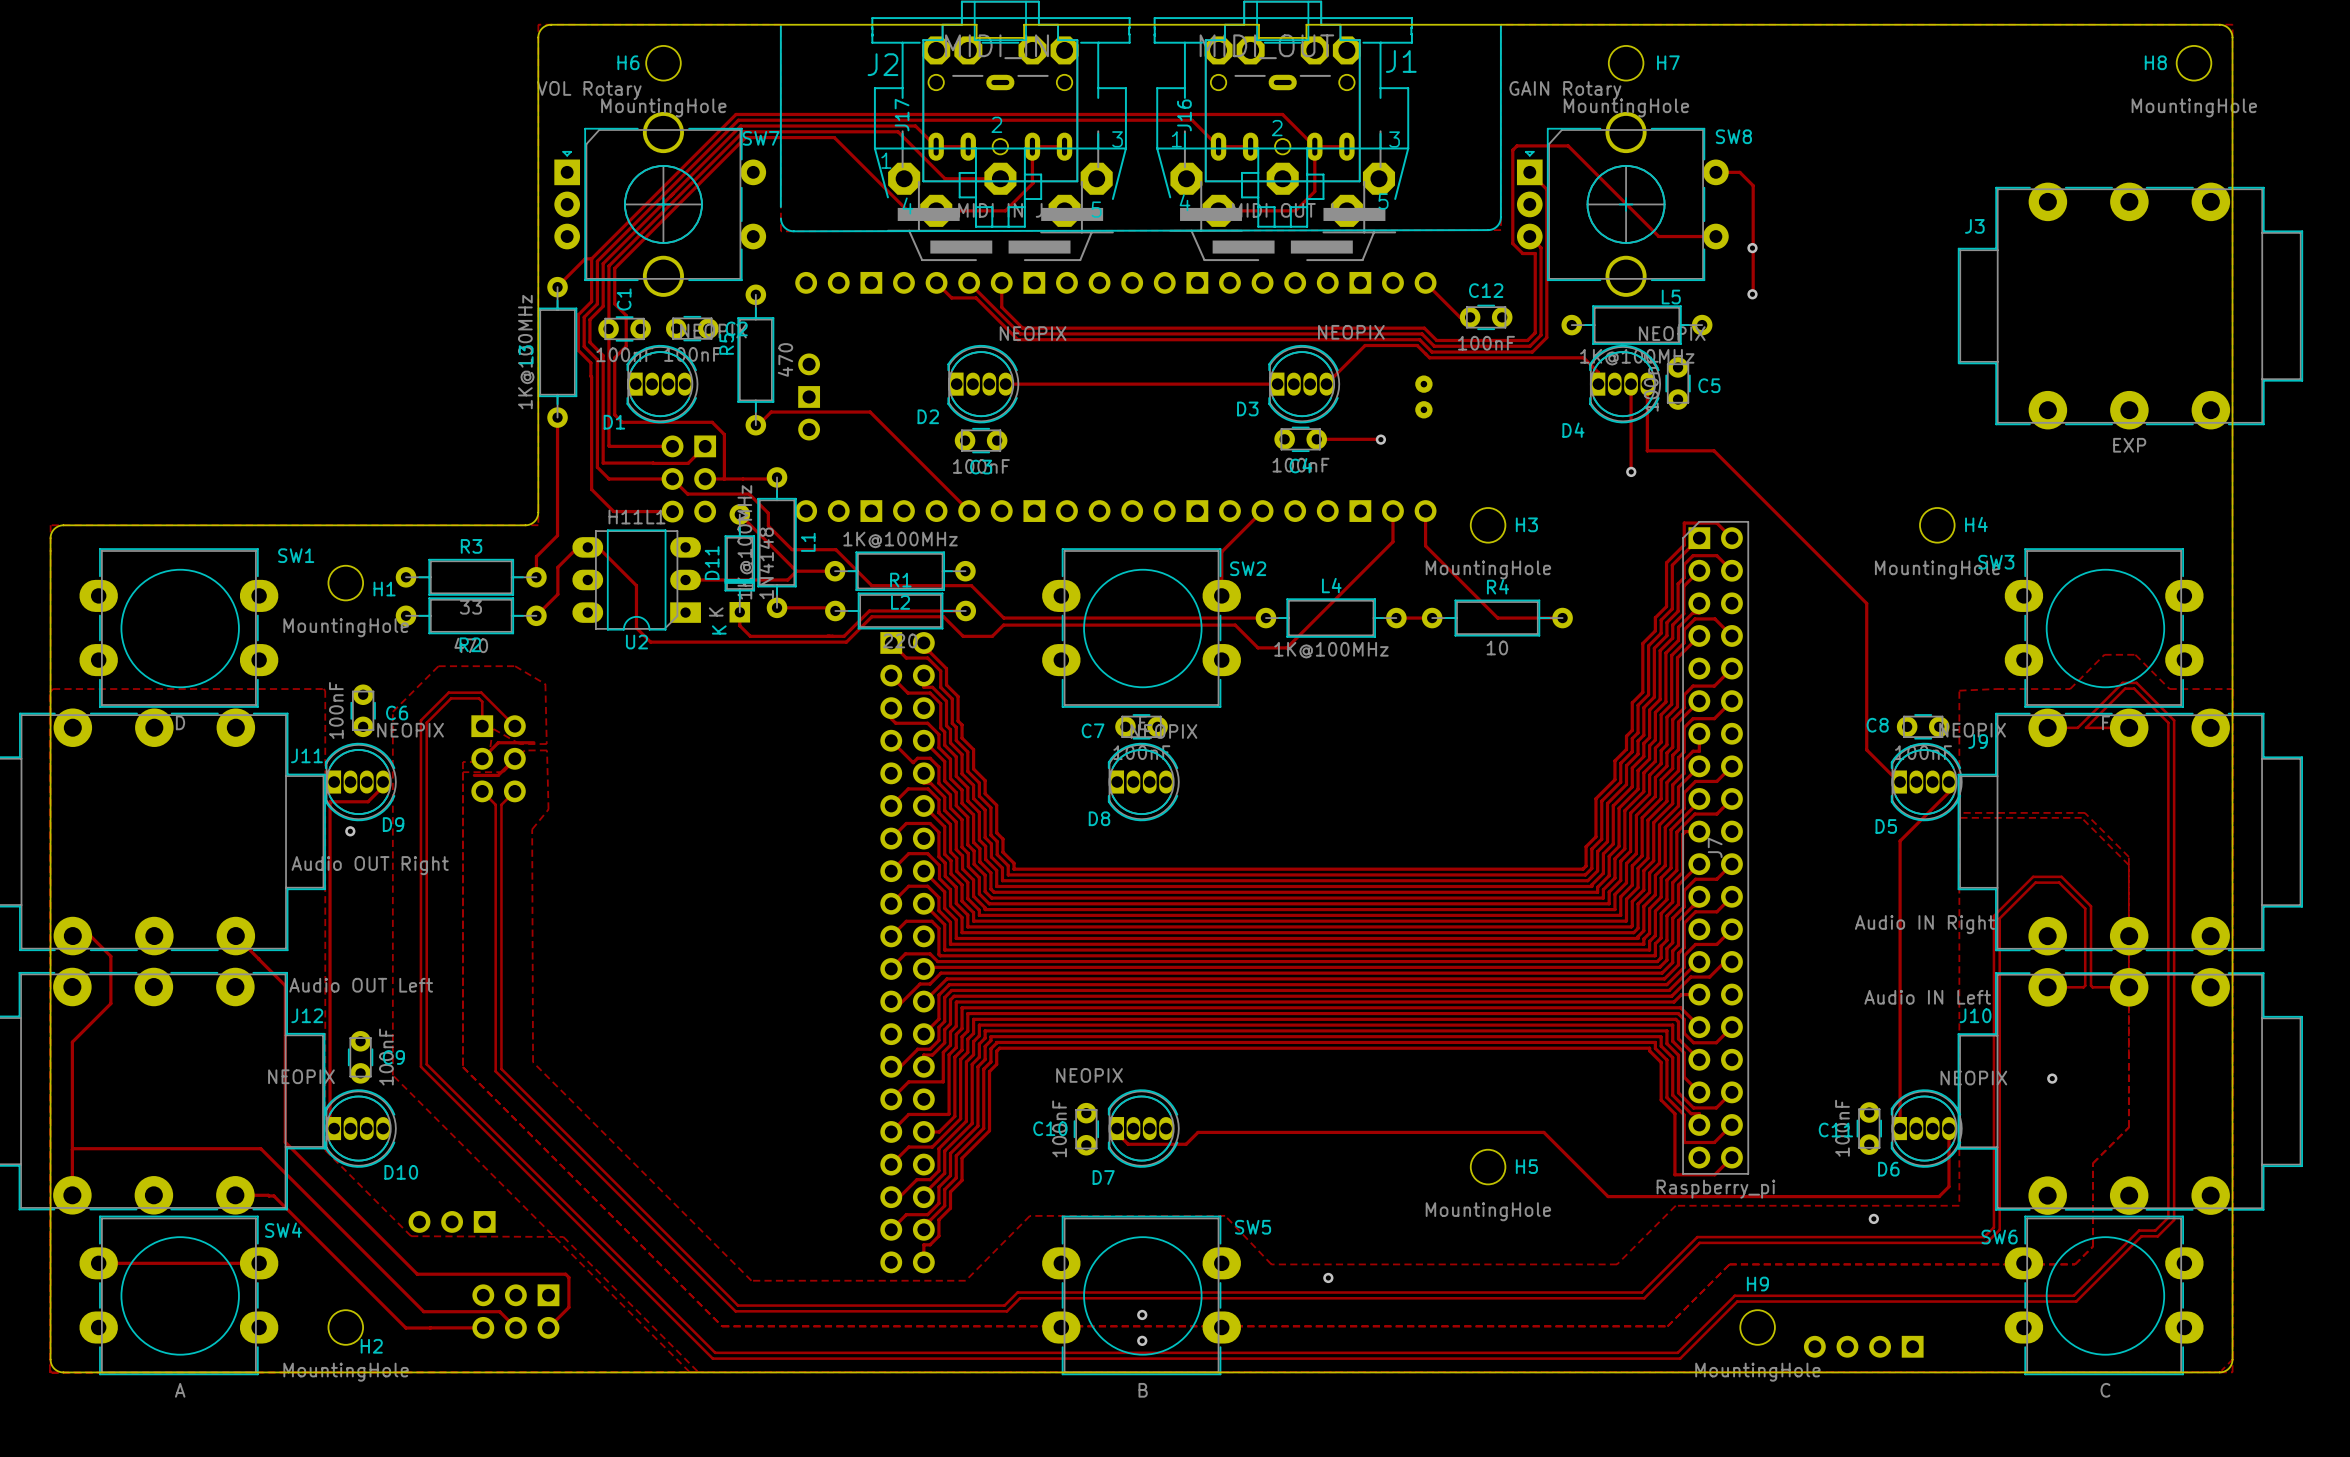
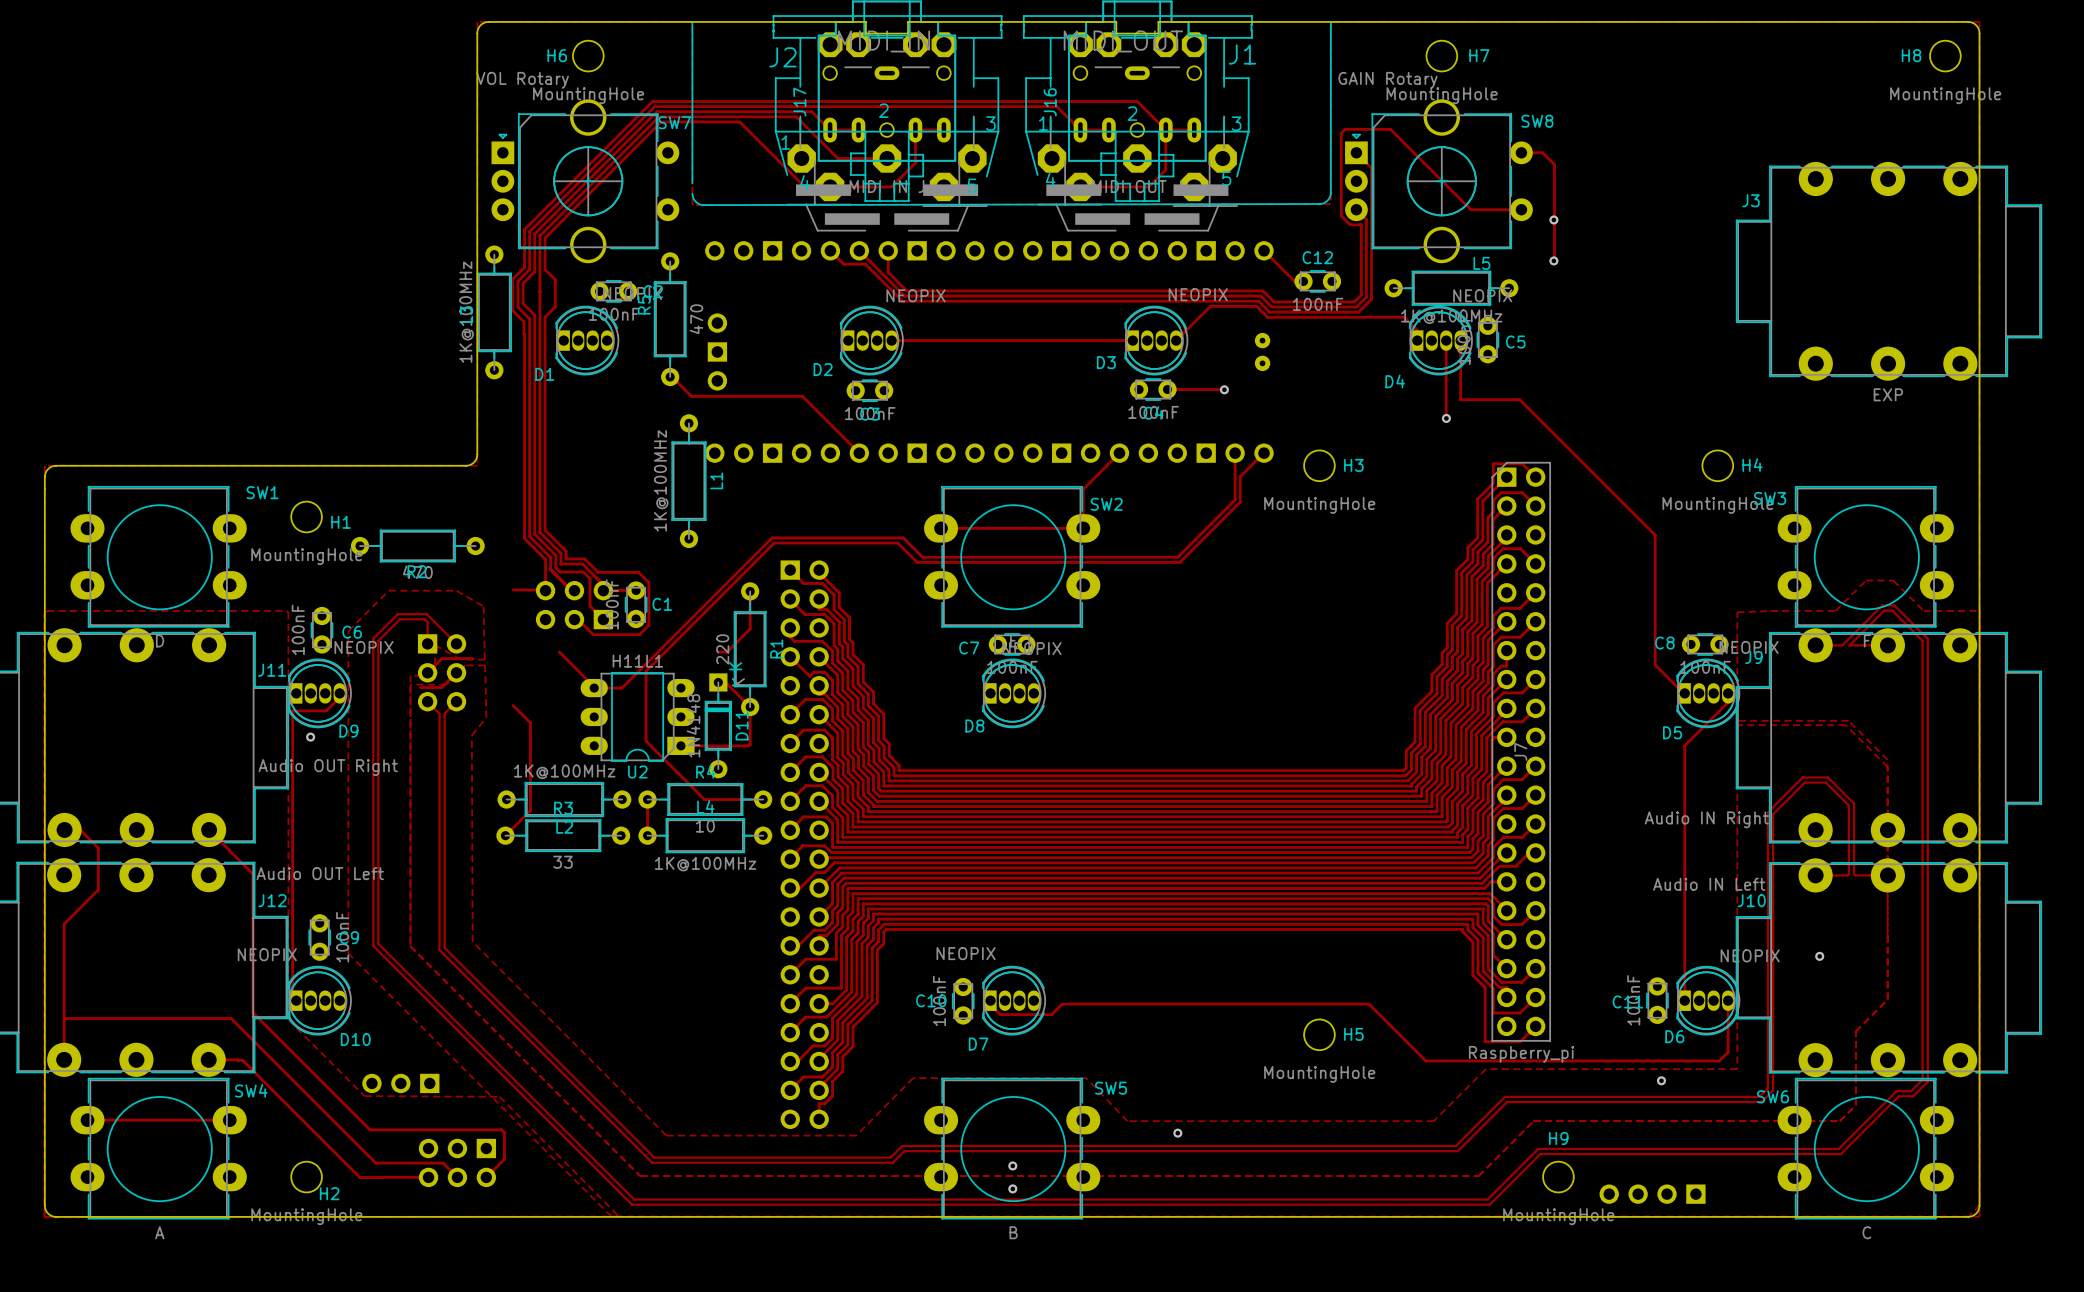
track: (591, 258) (585, 258) (557, 286) -> none
C1 rotation: 0° (624, 328) -> 90° clockwise (636, 604)
C1 position: (624, 328) -> (636, 604)
track: (614, 414) (622, 422) (712, 422) (724, 434) (724, 478) -> (545, 367) (545, 530) (566, 551) (566, 558) (584, 558) (598, 572) (638, 572) (648, 582) (648, 625) (639, 634) (593, 634) (574, 615)
track: (557, 416) (557, 535) (536, 556) (536, 577) -> none
track: (758, 425) (771, 412) (870, 412) (905, 447) -> (672, 377) (691, 396) (802, 396)
track: (608, 445) (672, 446) -> (539, 395) (539, 532) (560, 553) (560, 564) (582, 564) (603, 584) (603, 590) (635, 590)
track: (705, 446) (688, 463) (603, 463) -> (603, 619) (590, 606) (590, 578) (583, 572) (560, 572) (555, 567) (555, 555) (534, 534) (534, 410)
track: (597, 467) (609, 478) (672, 478) (687, 494) (749, 494) (768, 513) (768, 525) (792, 549) (835, 549) (871, 585) (971, 585) (1003, 618) (1265, 618) -> (529, 414) (529, 536) (550, 557) (550, 569) (571, 590) (574, 590)
track: (777, 477) (775, 478) (705, 478) -> none
part rotation: 0° (688, 478) -> 90° clockwise (574, 605)
part position: (688, 478) -> (574, 605)
track: (591, 489) (613, 511) (672, 511) -> (524, 433) (524, 538) (545, 559) (545, 590) (513, 589)
track: (1425, 511) (1425, 545) (1497, 618) (1562, 618) -> (1264, 453) (1240, 476) (1240, 502) (1179, 562) (917, 562) (897, 543) (774, 543) (646, 671) (646, 741) (704, 799) (763, 799)
track: (739, 514) (796, 571) -> none
track: (1392, 541) (1286, 647) (1258, 647) (1235, 625) (1003, 625) (992, 636) (963, 636) (943, 616) (871, 616) (846, 642) (650, 642) (636, 627) (636, 585) (598, 547) (577, 547) (557, 567) (557, 594) (536, 615) -> (1235, 480) (1235, 499) (1177, 557) (922, 557) (903, 537) (772, 537) (621, 688) (595, 688) (559, 652)
D11 rotation: 0° (739, 563) -> 180° (718, 725)
D11 position: (739, 563) -> (718, 725)
track: (796, 571) (787, 579) (685, 579) -> none
track: (796, 571) (835, 571) -> none
L2 position: (900, 571) -> (564, 799)
R3 position: (471, 577) -> (563, 835)
U2 position: (636, 579) -> (637, 716)
track: none -> (941, 528) (1083, 528)
track: (777, 607) (832, 607) (835, 610) -> none
R1 rotation: 0° (900, 610) -> 90° clockwise (750, 649)
R1 position: (900, 610) -> (750, 649)
track: (965, 610) (869, 610) (844, 636) (750, 636) (739, 625) (739, 612) -> none
L4 position: (1331, 618) -> (705, 835)
track: (1396, 618) (1432, 618) -> none
R4 position: (1497, 618) -> (705, 799)
track: none -> (750, 591) (750, 628) (727, 652) (718, 652)
track: none -> (718, 682) (725, 682) (750, 707) (750, 744) (680, 745)
track: none -> (513, 705) (530, 722) (530, 810) (505, 835)
track: none -> (647, 799) (647, 835)

